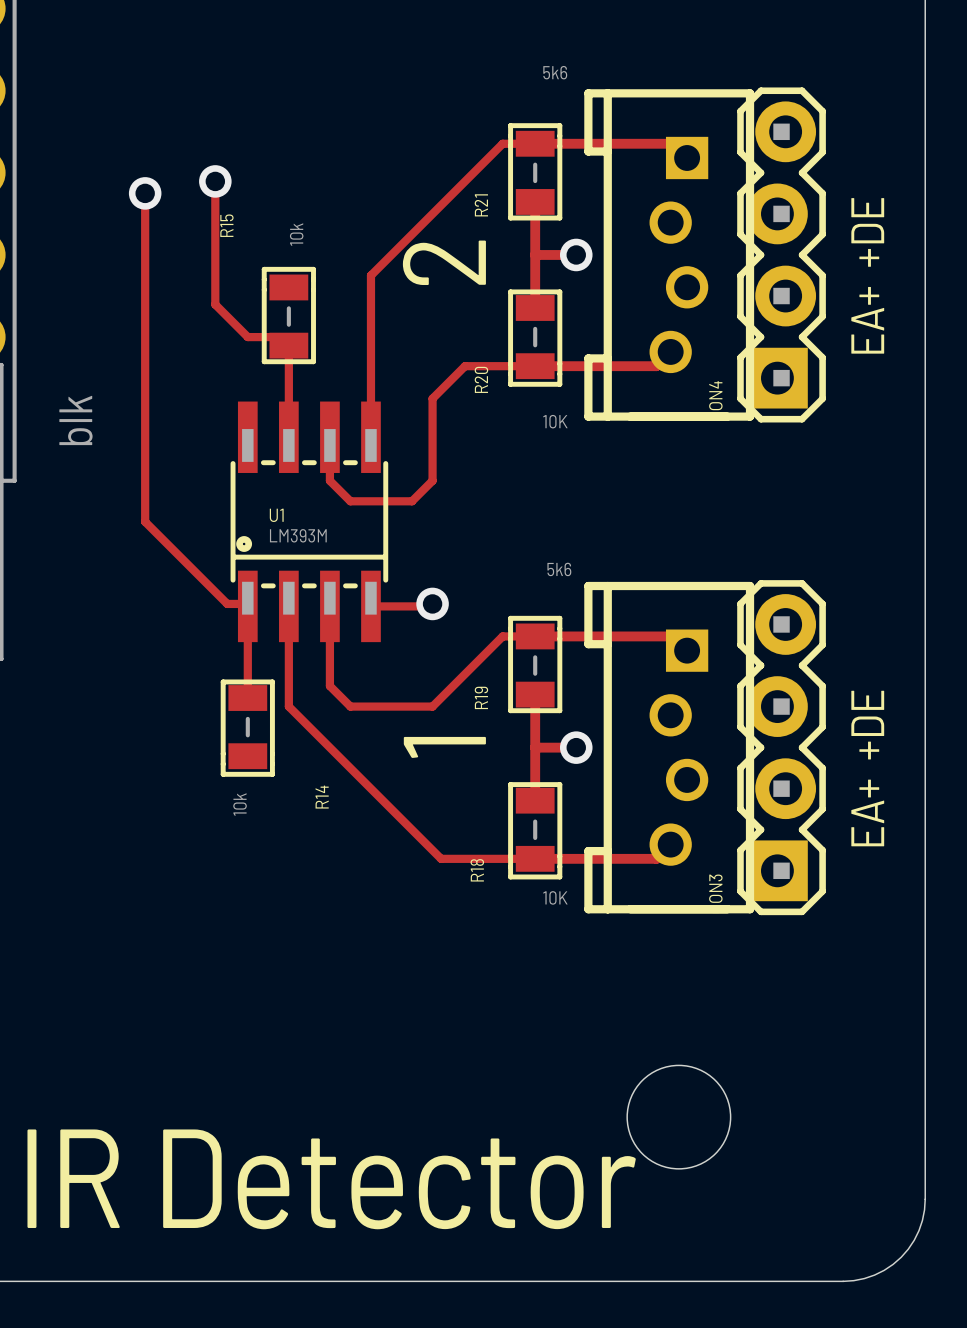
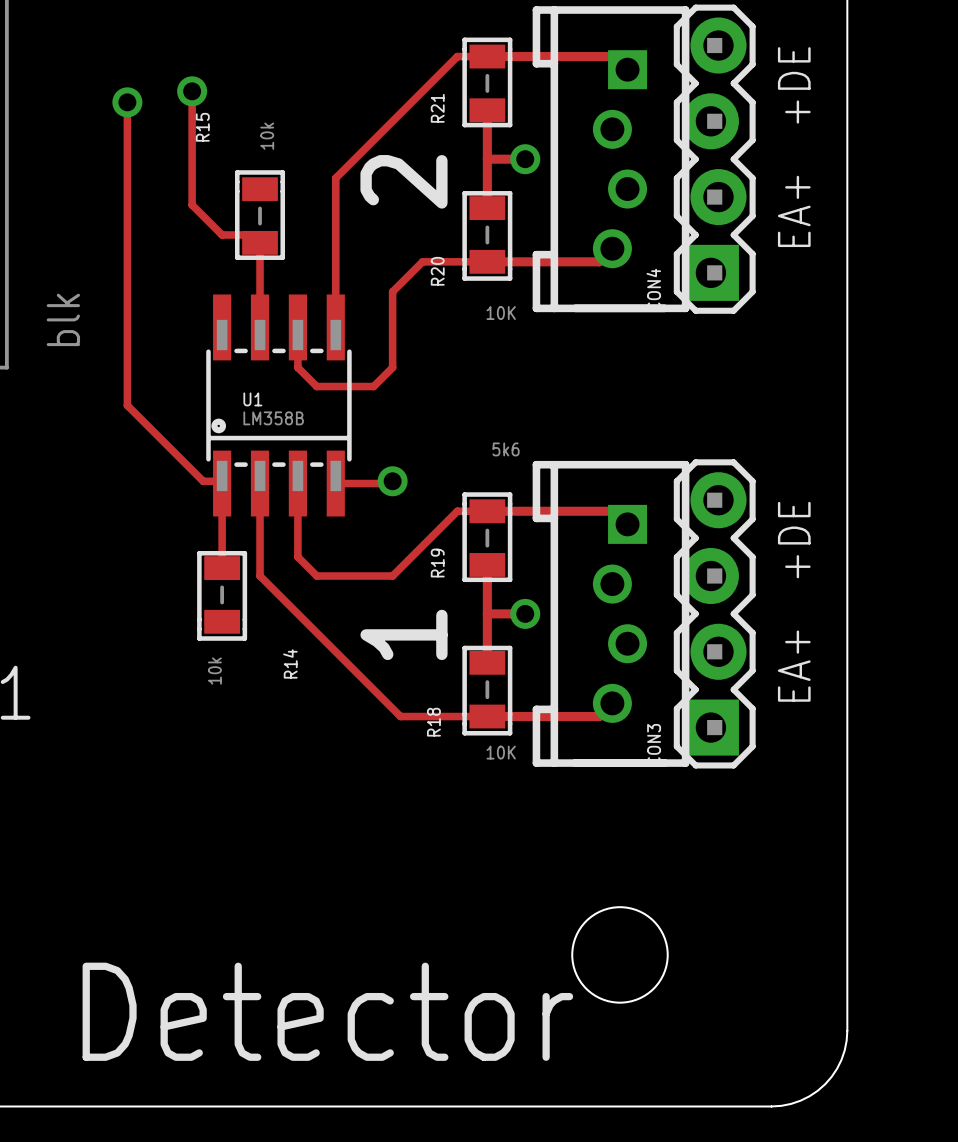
U1 value: LM393M (298, 535) -> LM358B (273, 418)

